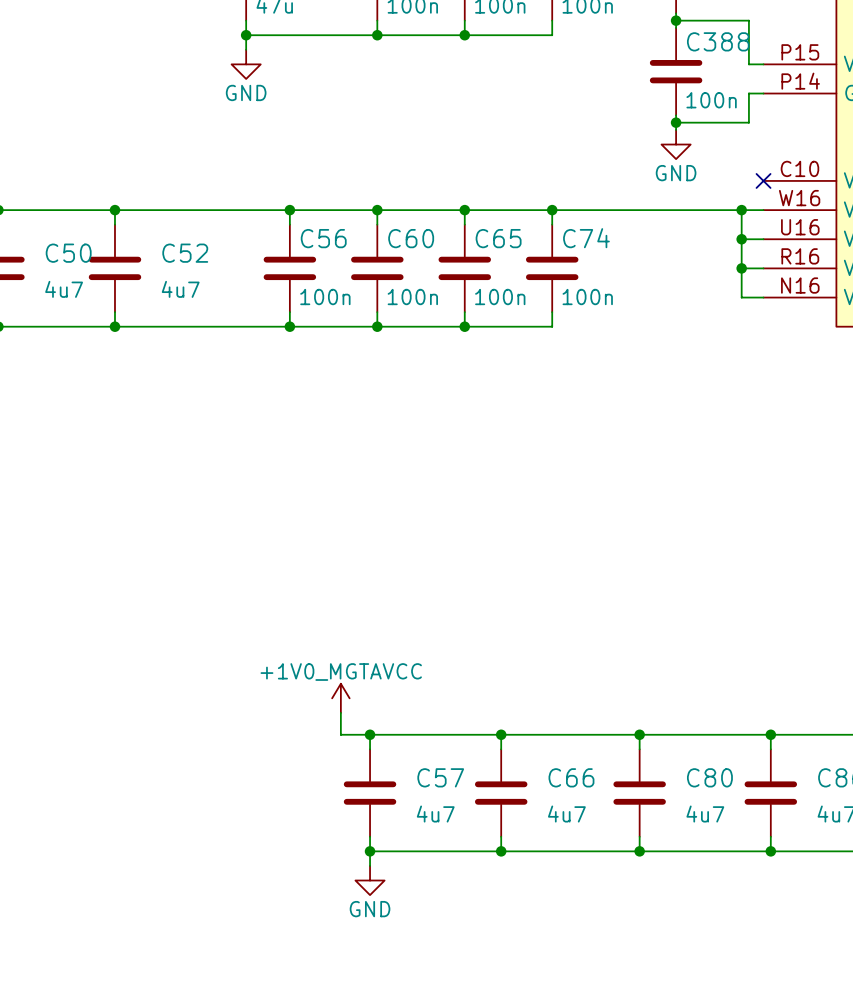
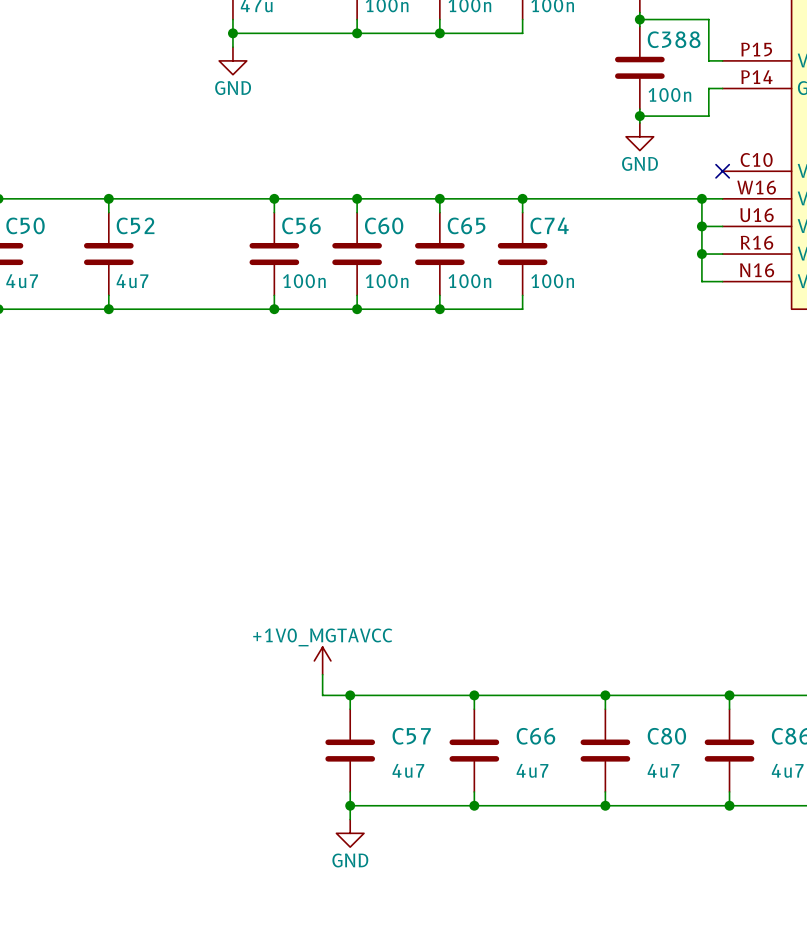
C50 name position: C50 (68, 253) -> C50 (25, 225)
C52 name position: C52 (185, 253) -> C52 (135, 225)
C50 text position: 4u7 (64, 289) -> 4u7 (22, 281)
C52 text position: 4u7 (180, 289) -> 4u7 (132, 281)

